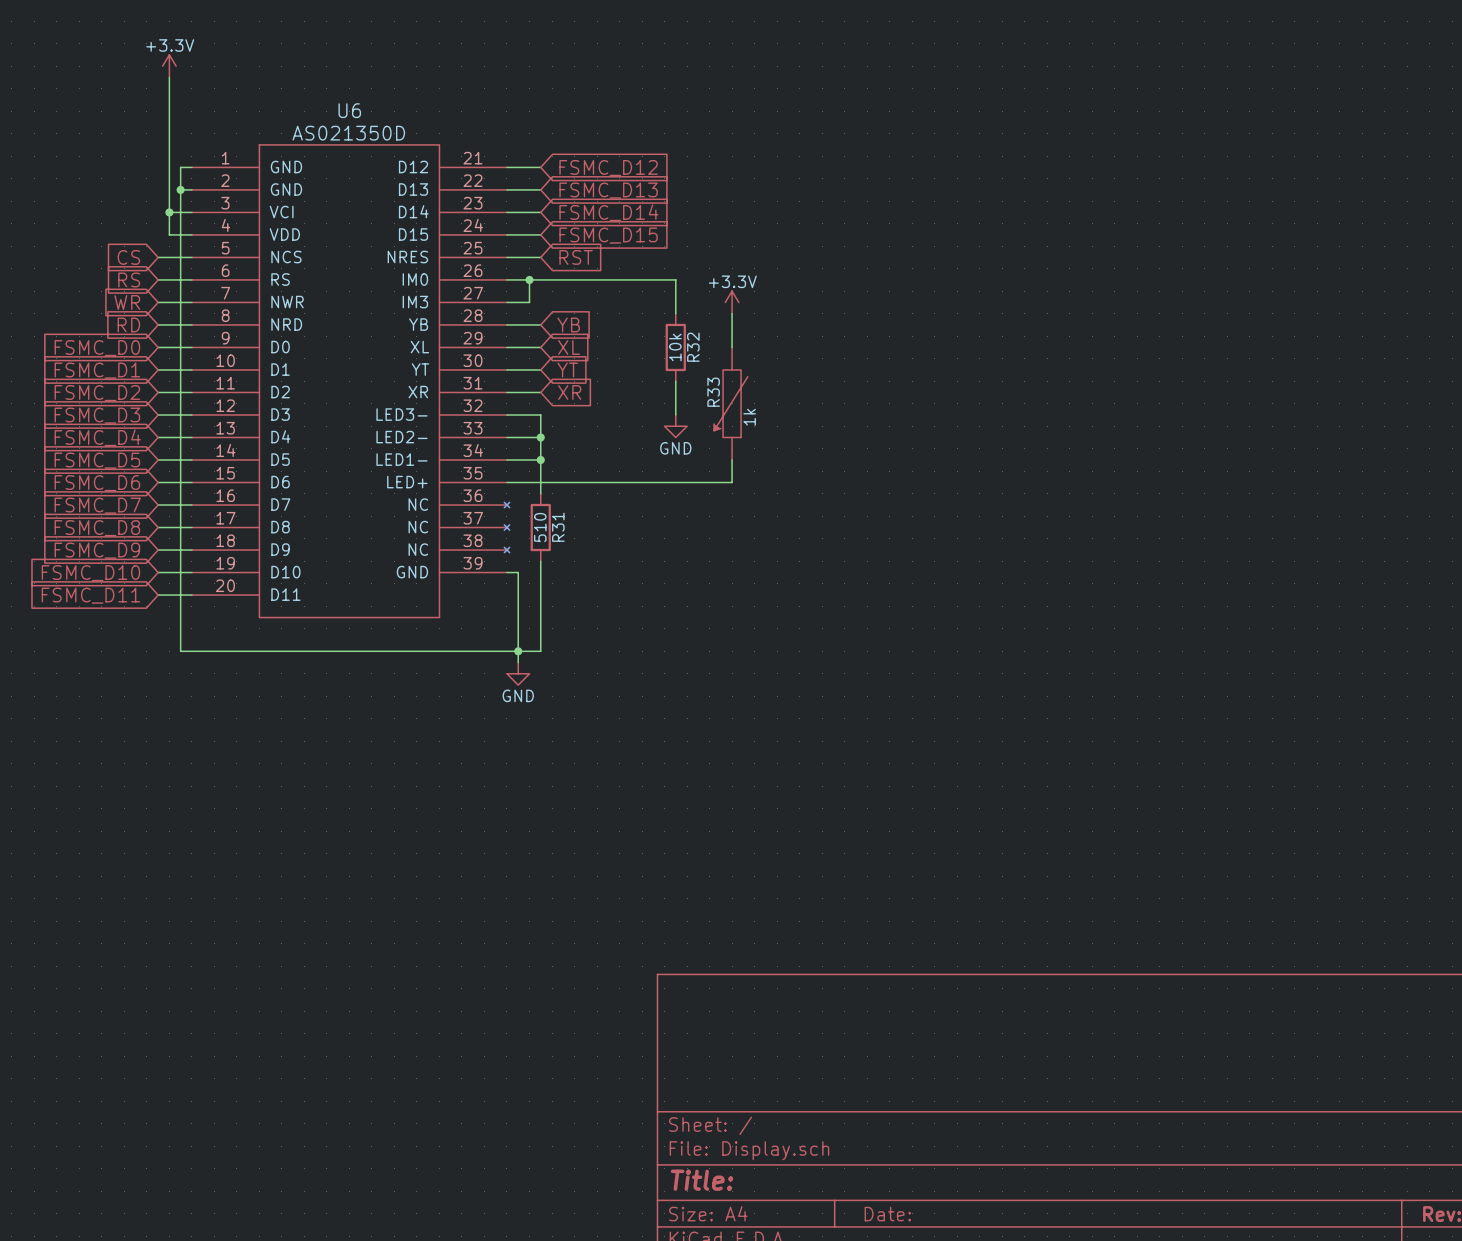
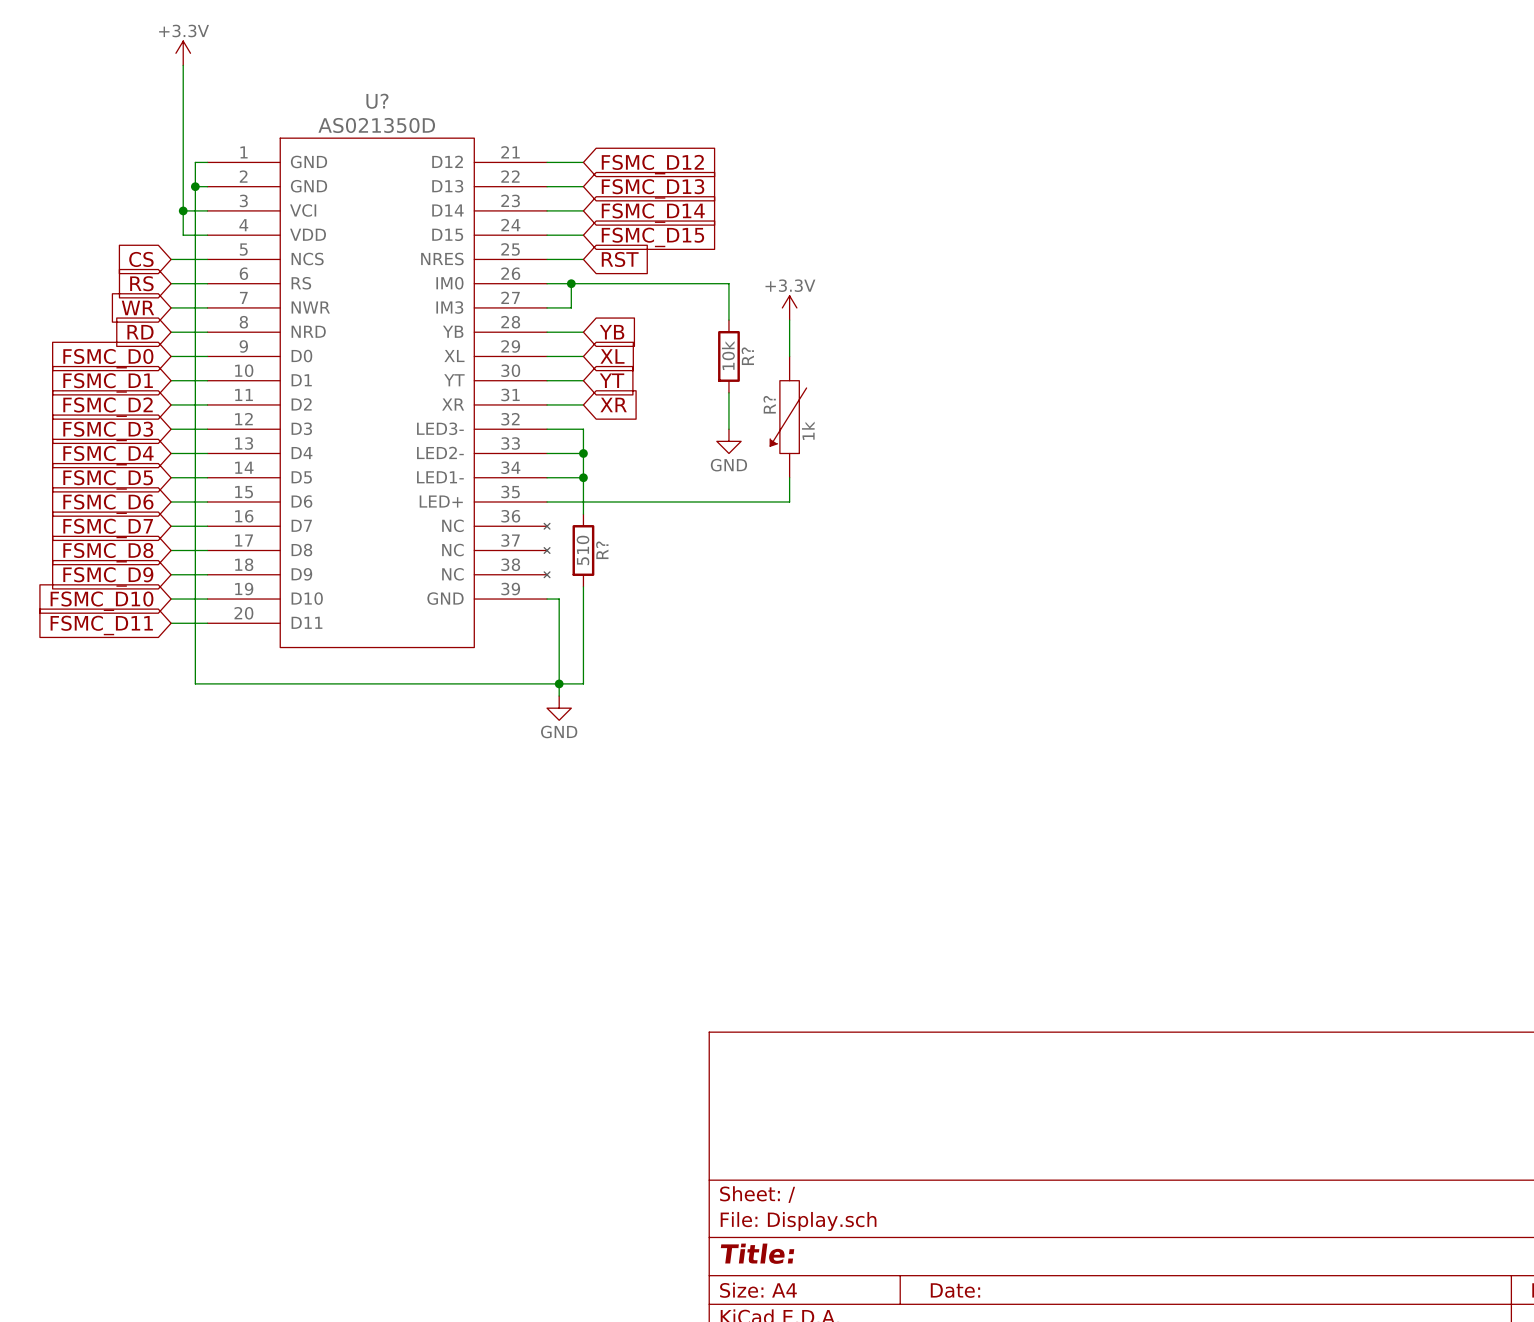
U6 name: U6 (349, 110) -> U? (377, 101)
R32 name: R32 (693, 347) -> R? (747, 356)
R33 name: R33 (713, 392) -> R? (769, 404)
R31 name: R31 (558, 527) -> R? (602, 550)

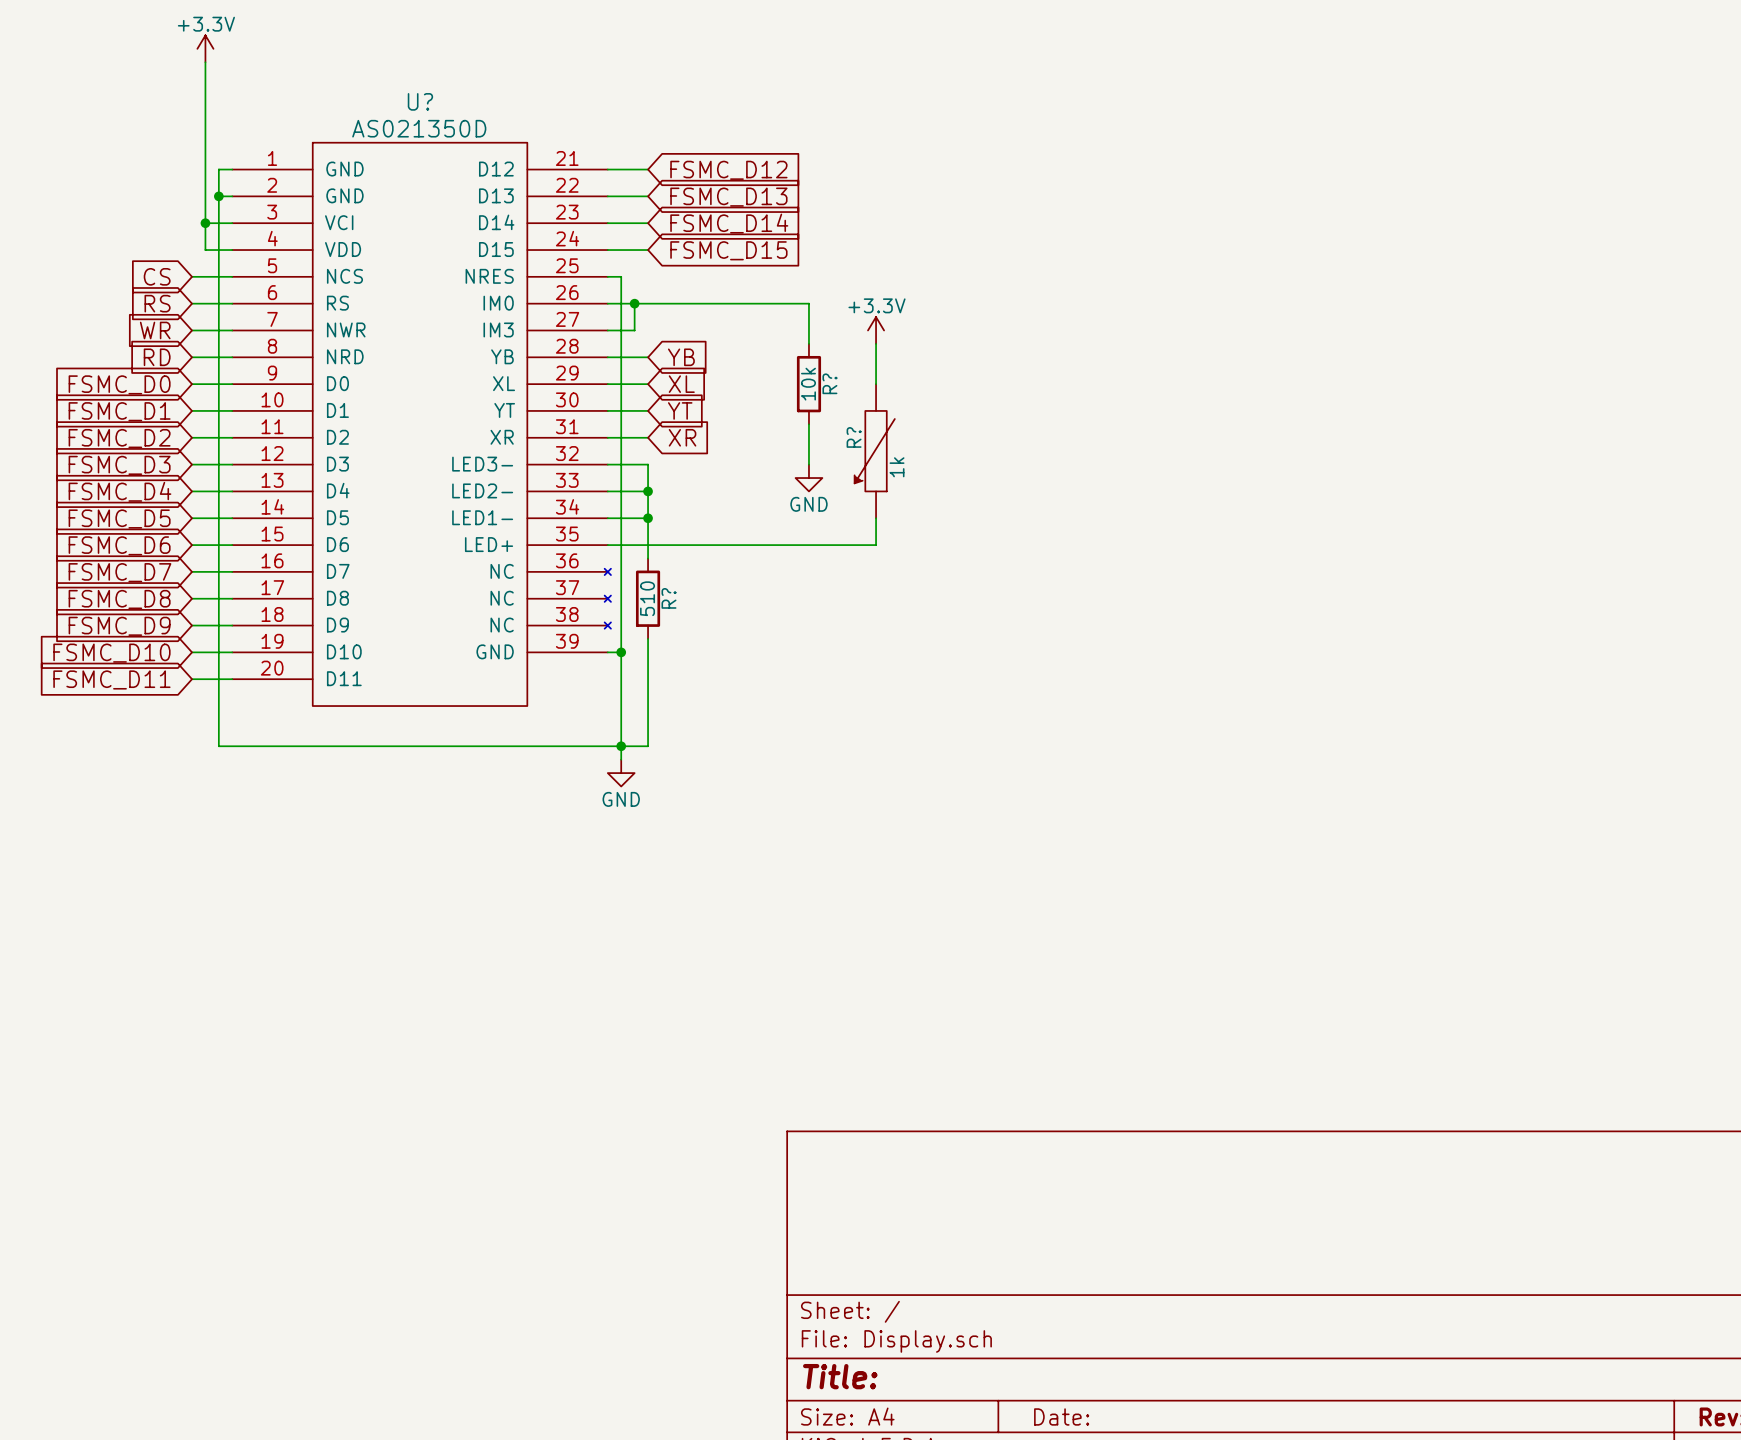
wire: (559, 259) (583, 259) -> (621, 276) (621, 652)
global label: RST (620, 259) -> none
junction: none -> (621, 652)

